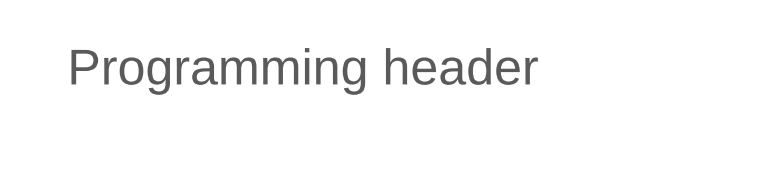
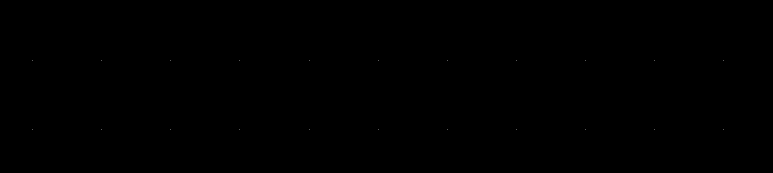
text: Programming header (304, 71) -> none

